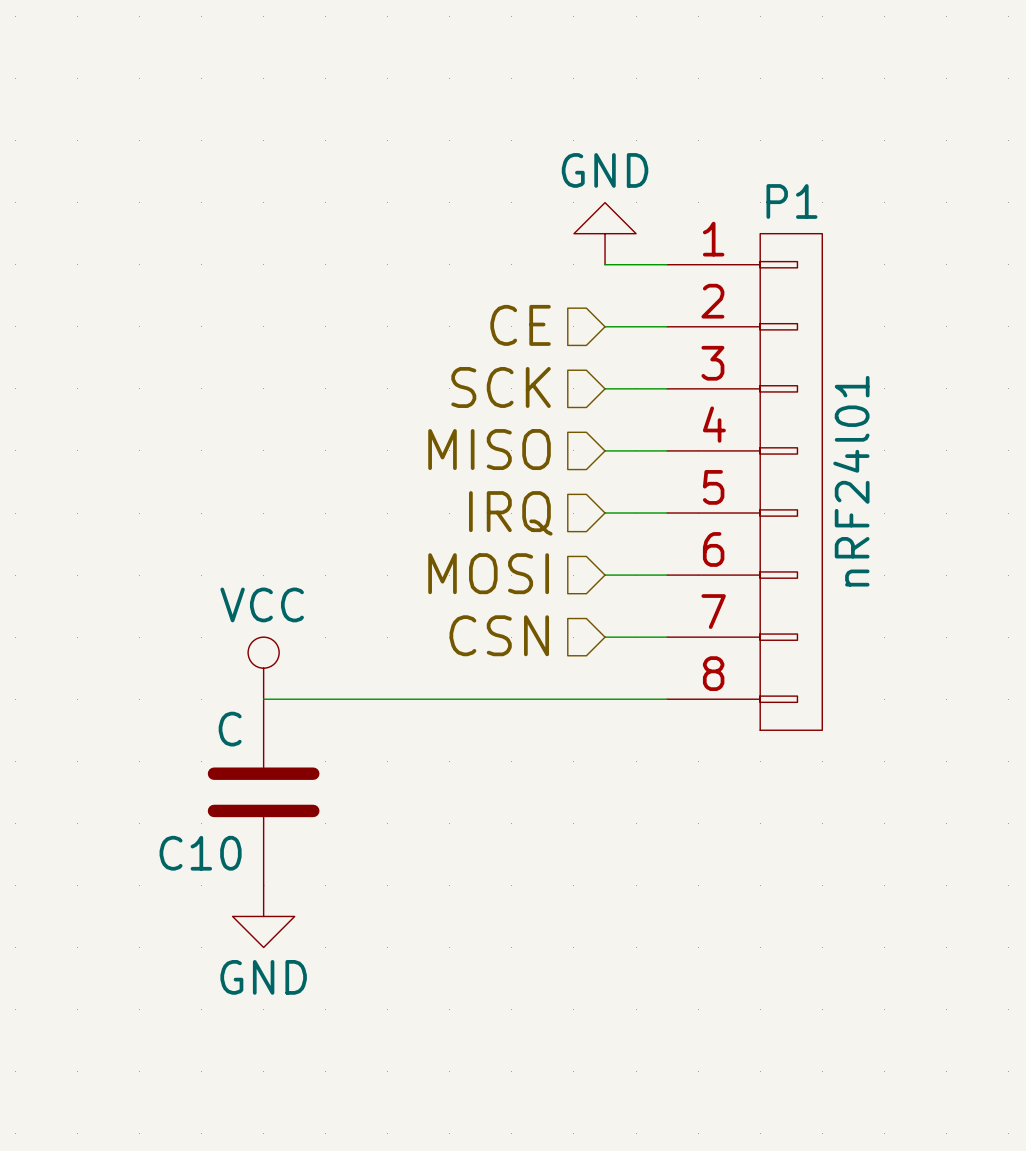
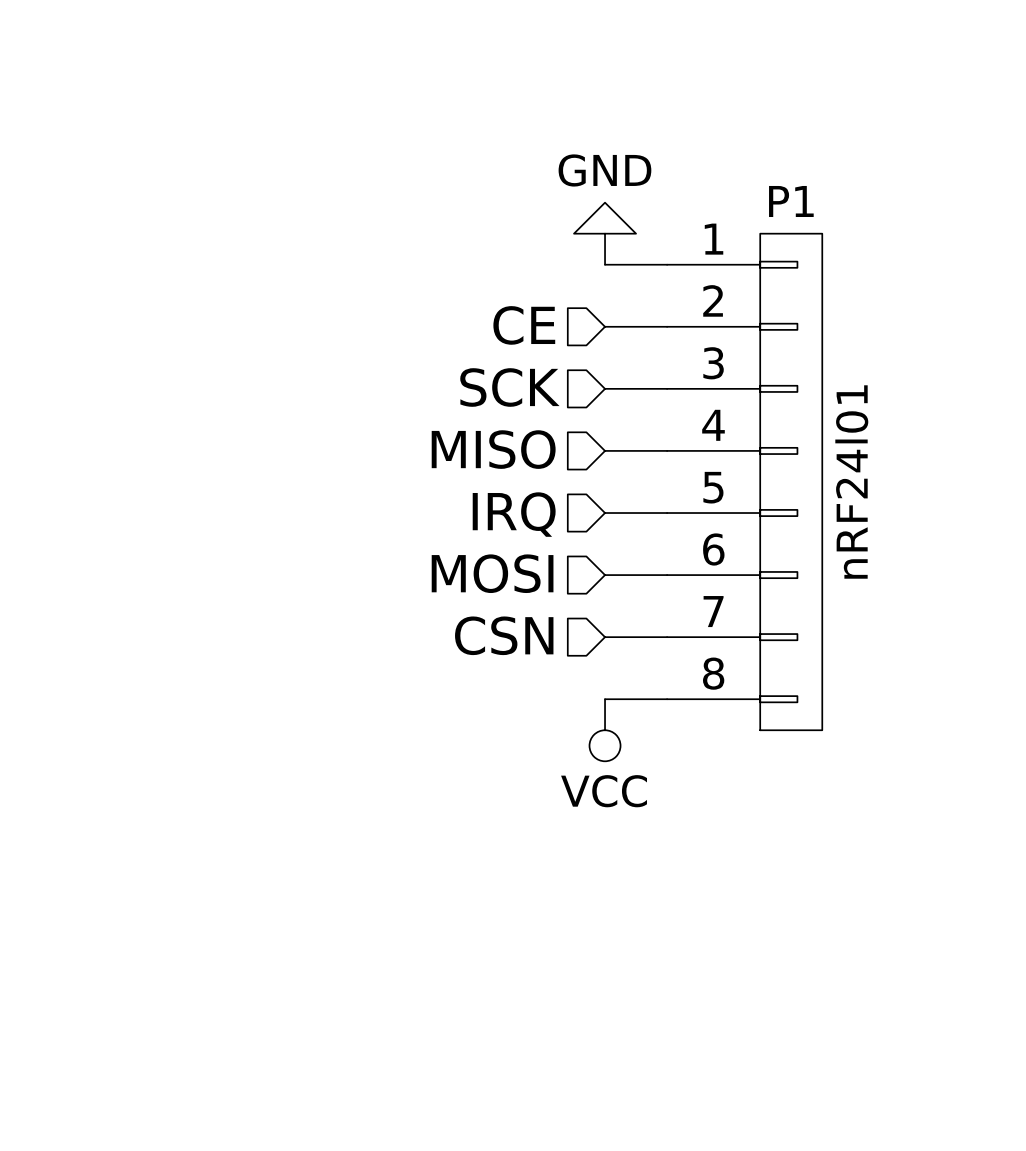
power symbol rotation: 0° (263, 668) -> 180° (605, 730)
power symbol position: VCC (263, 668) -> VCC (605, 730)
wire: (263, 699) (605, 699) -> none
C10: C (263, 792) -> none
power symbol: GND (263, 916) -> none

